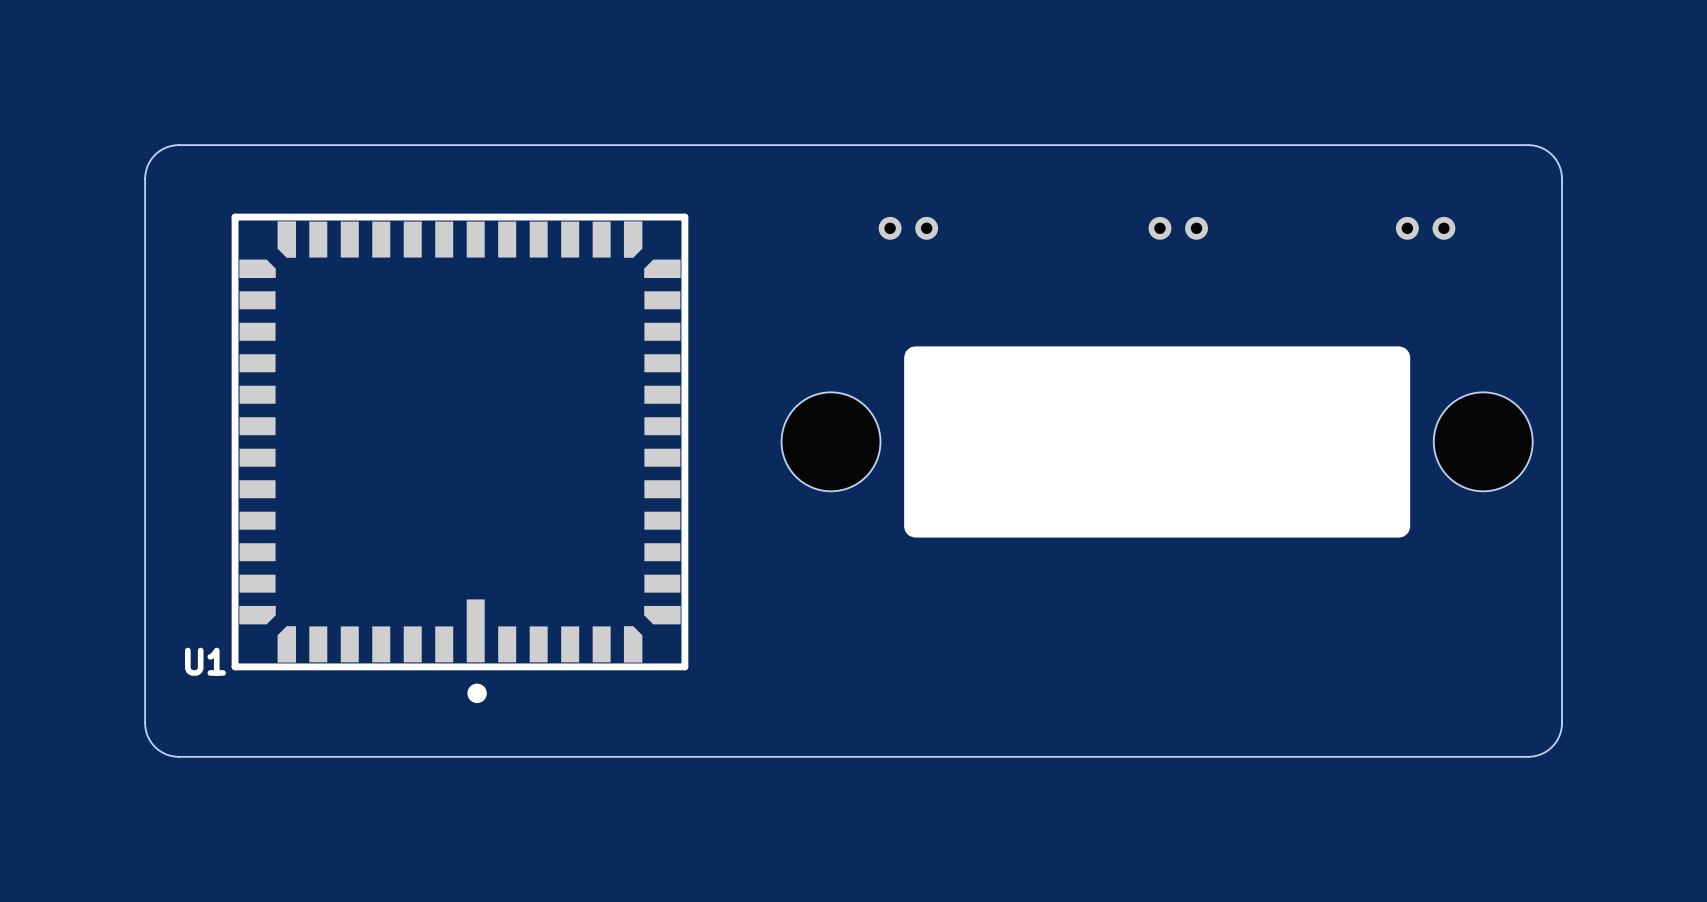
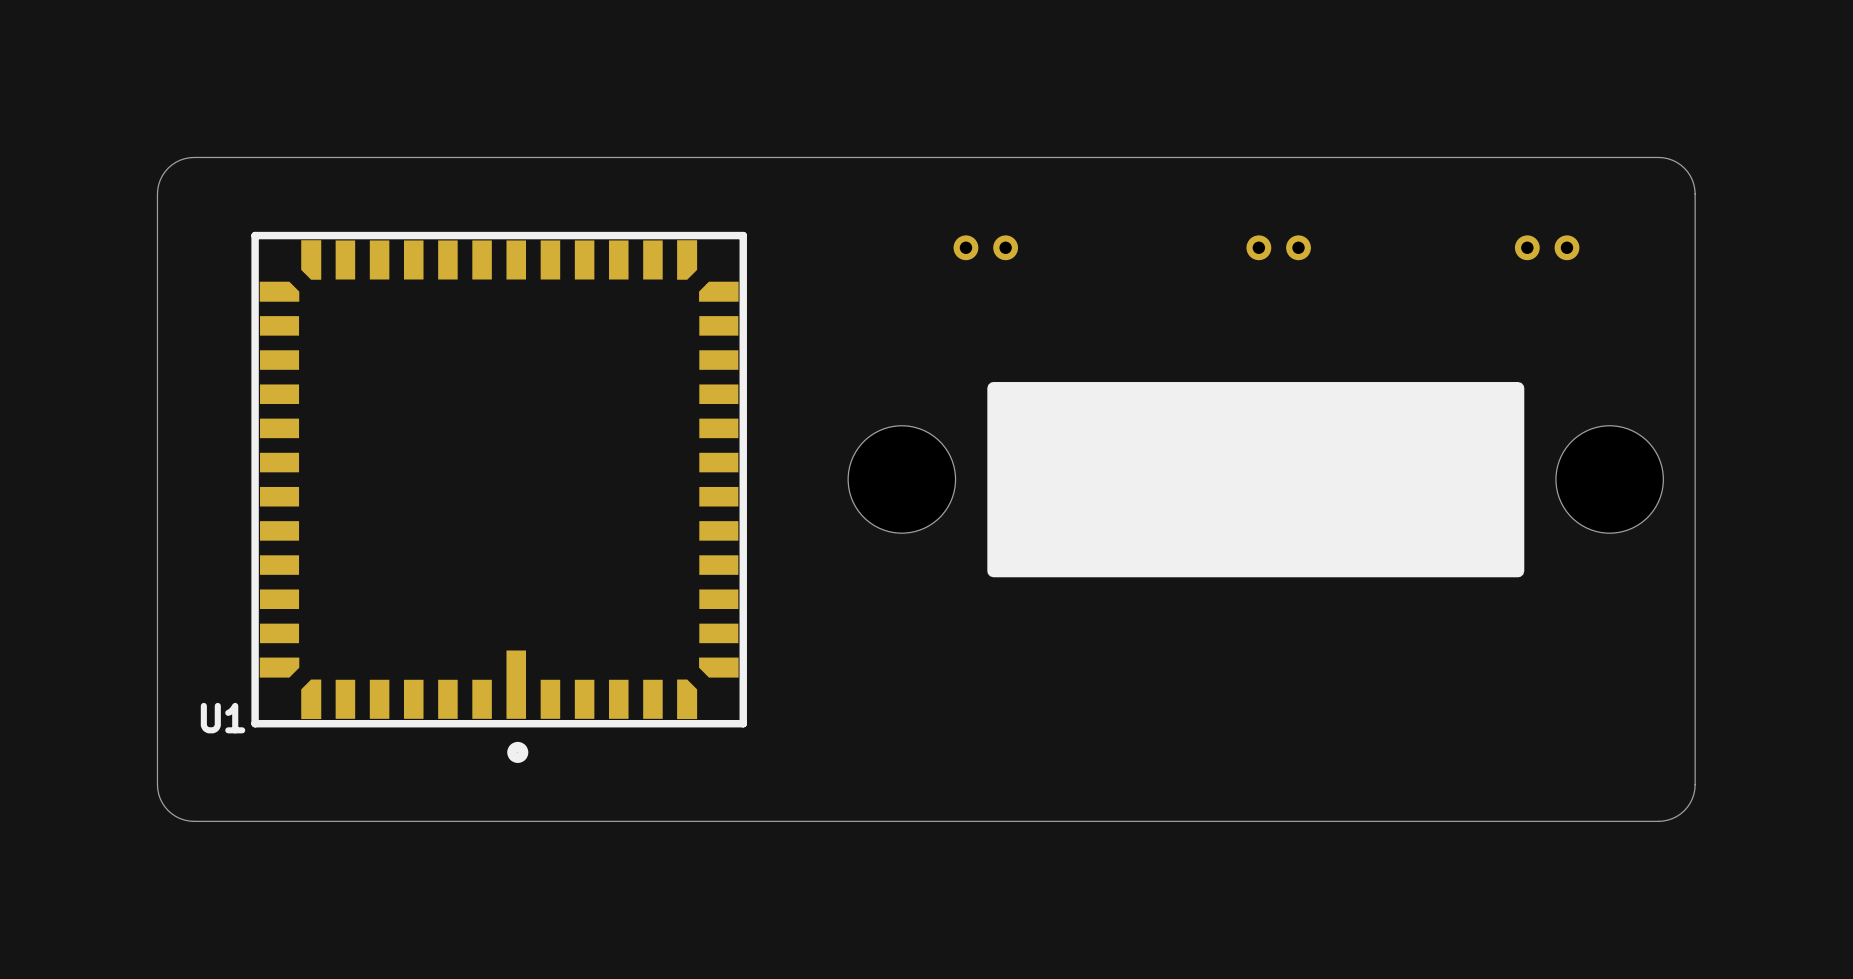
drawing shape: [904, 346, 1411, 538] -> [987, 382, 1525, 578]

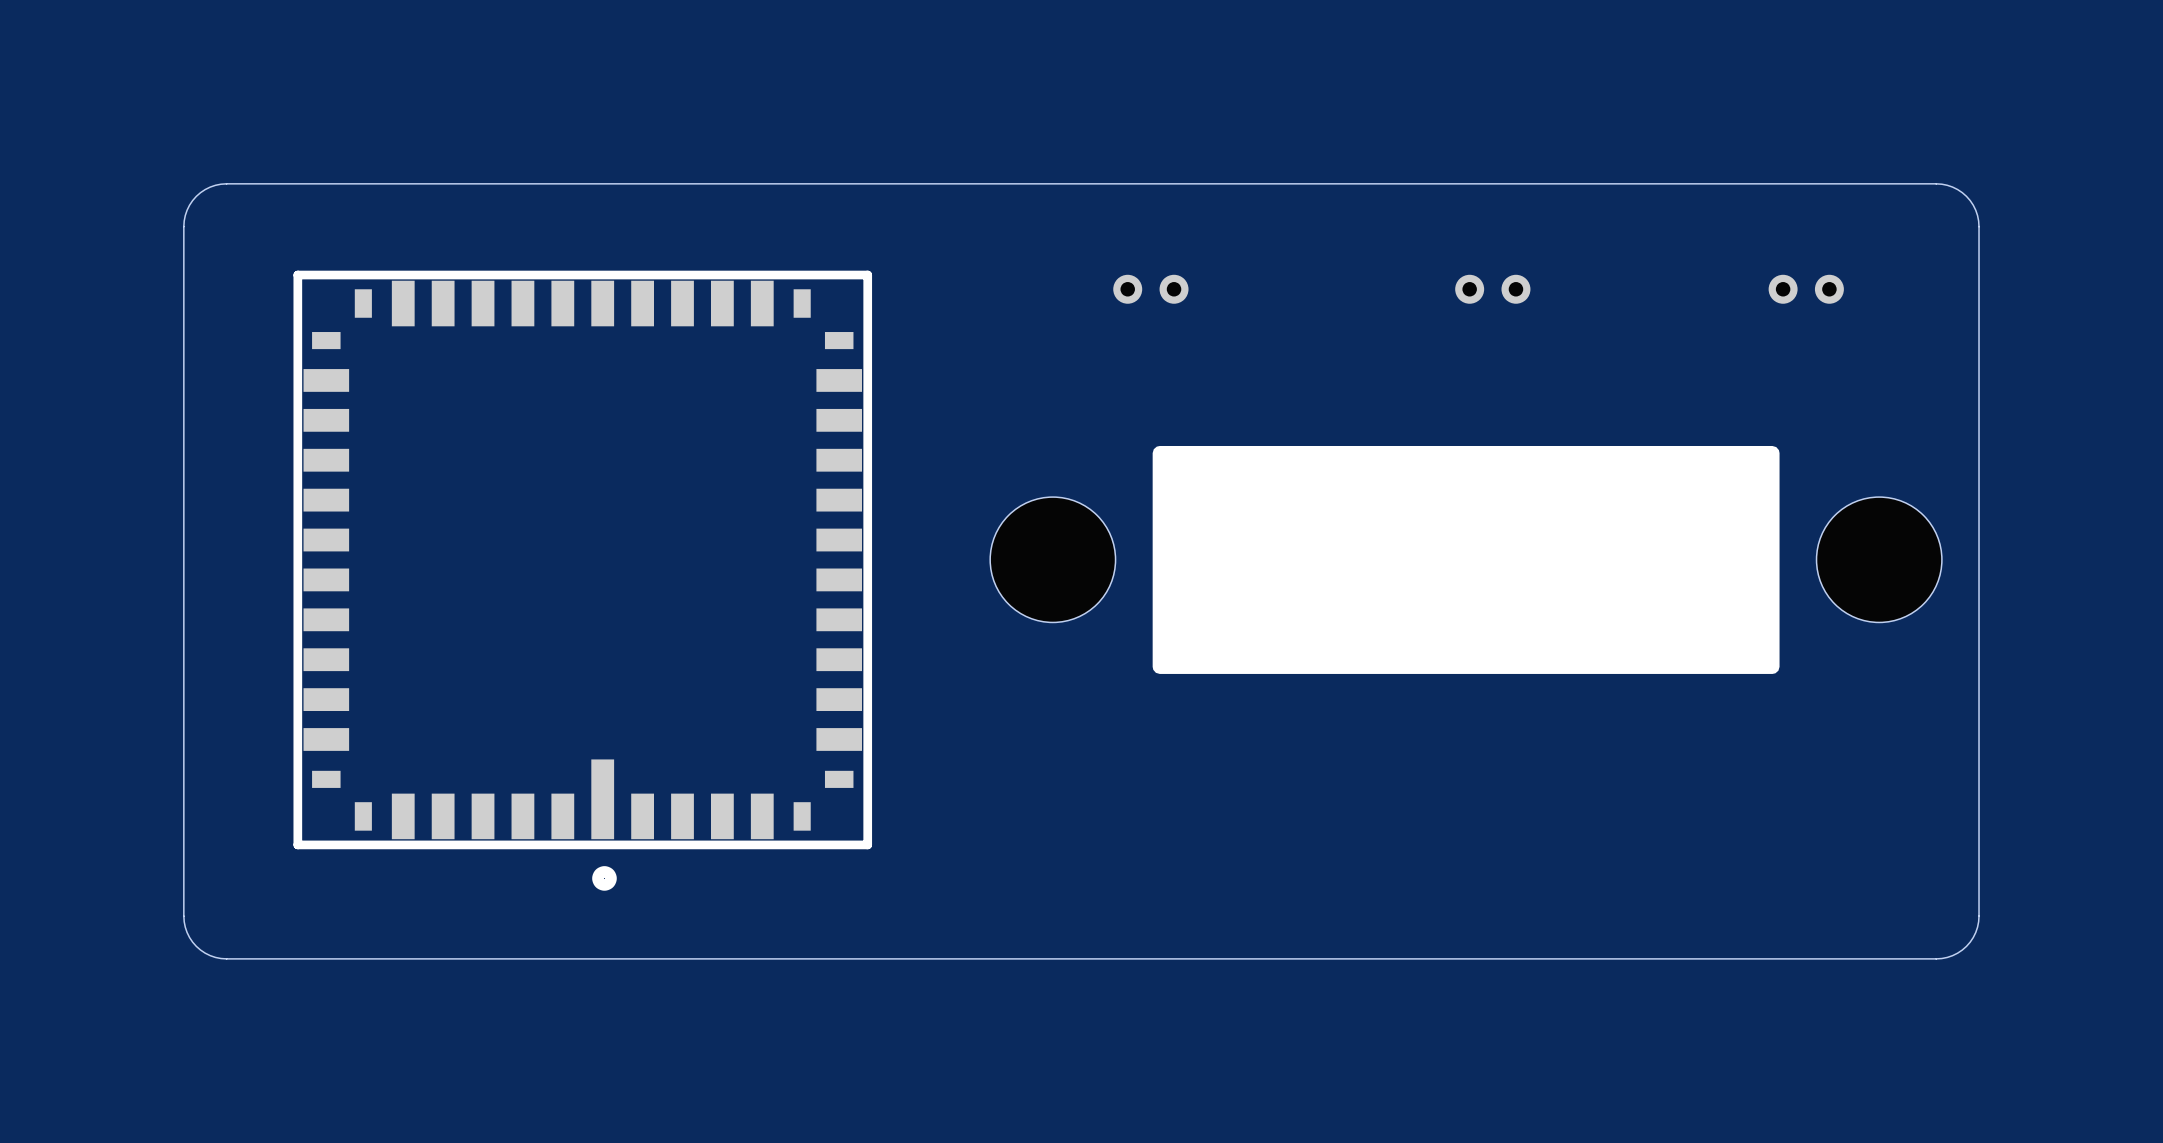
U1: (499, 497) -> none
part: none -> (582, 580)

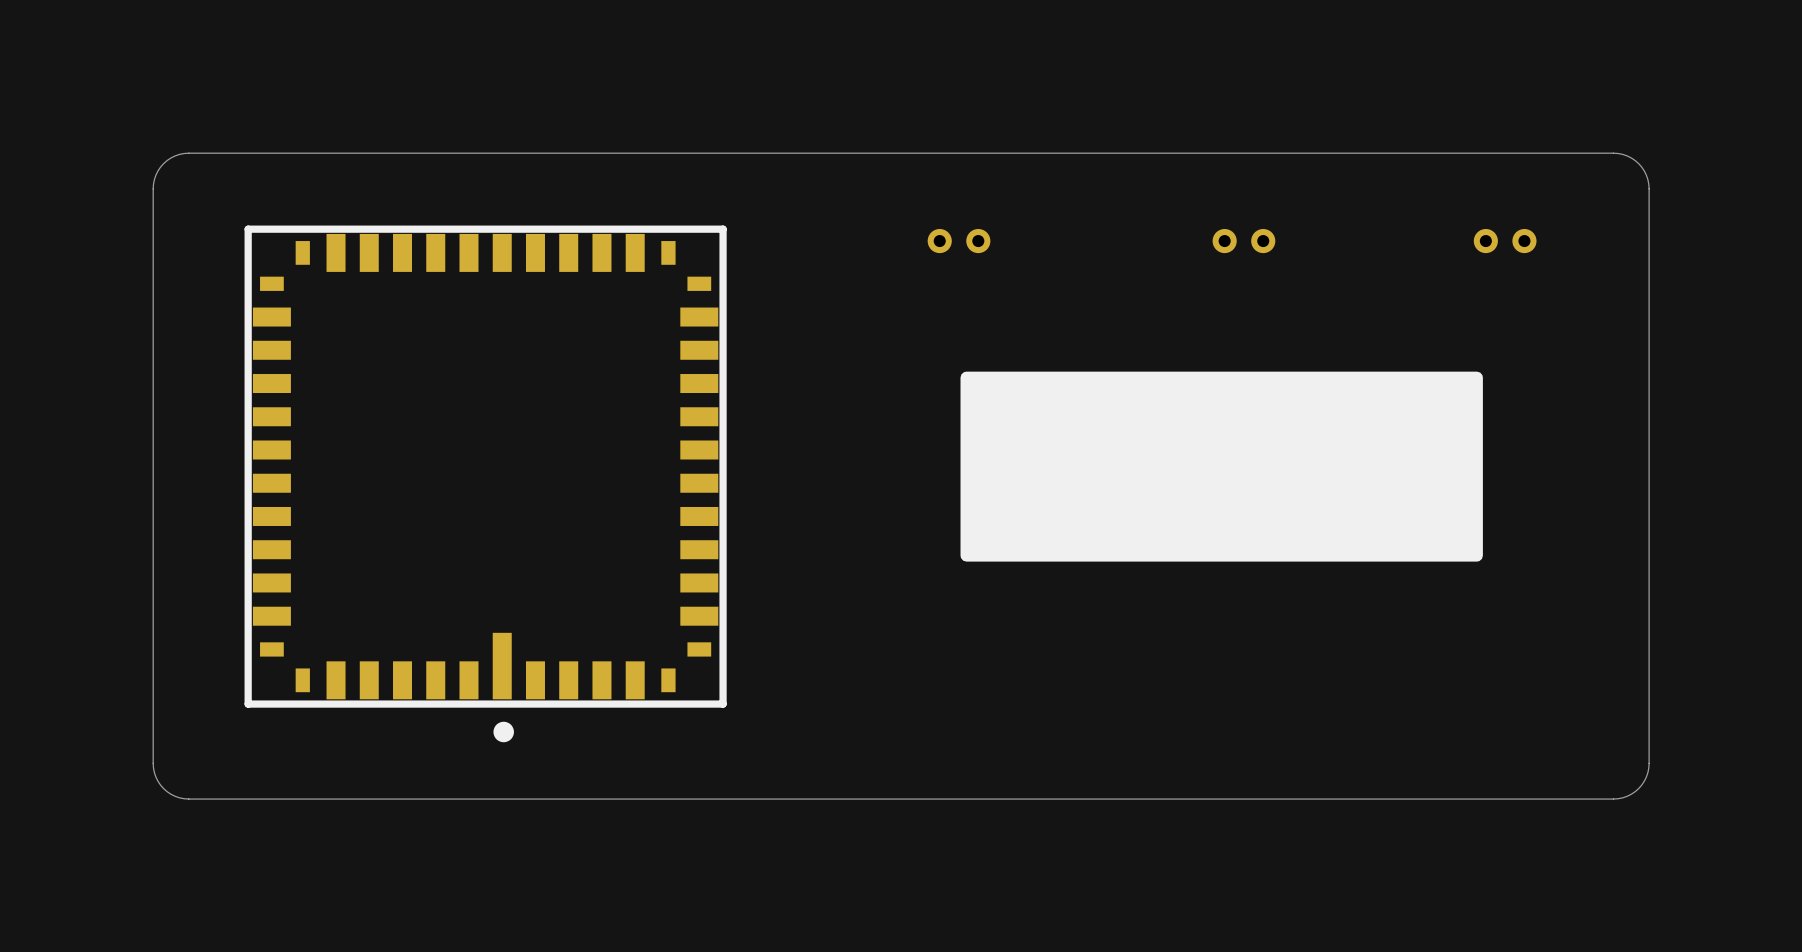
part: (1052, 559) -> none
part: (1879, 559) -> none

